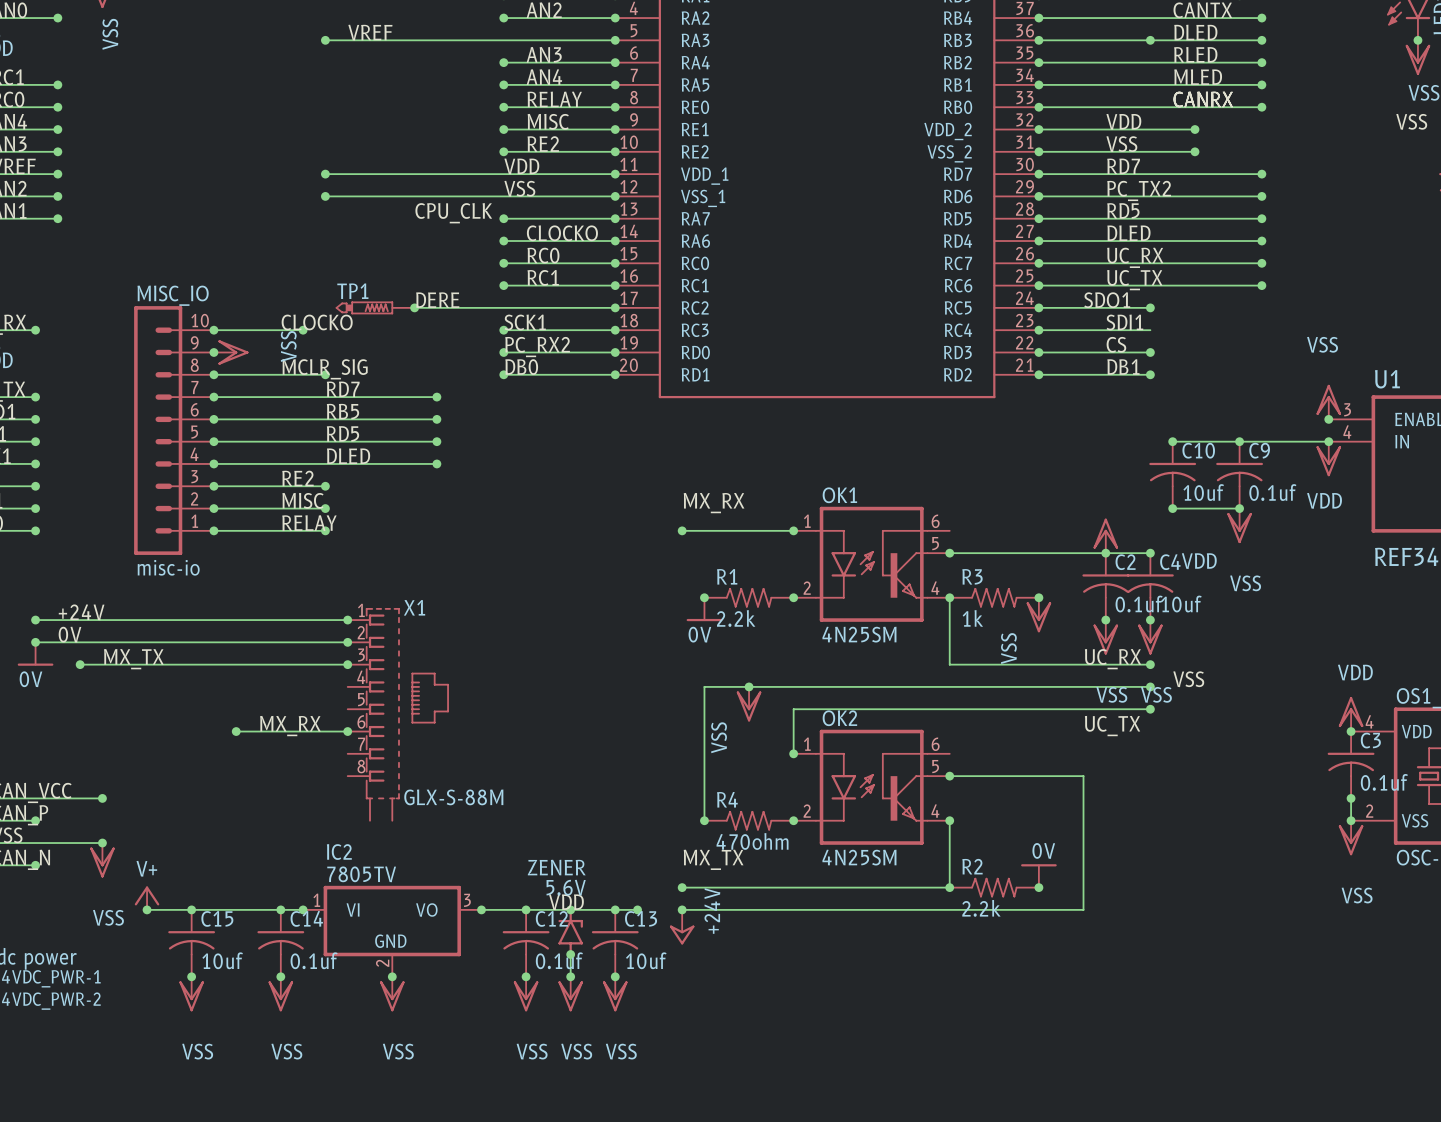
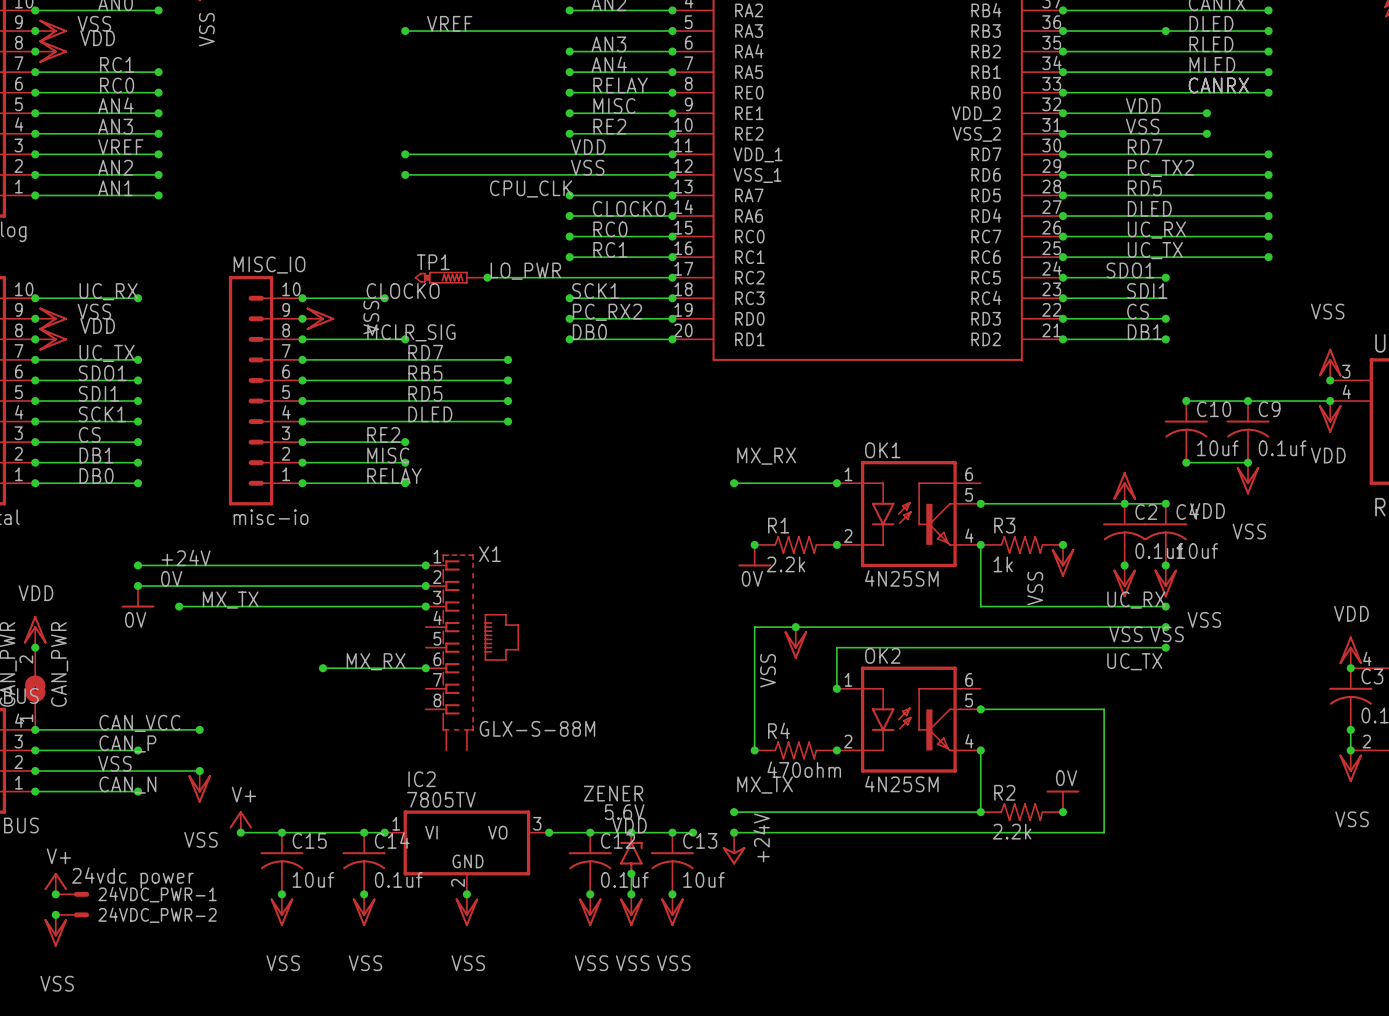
label: DERE (437, 300) -> LO_PWR (525, 271)

